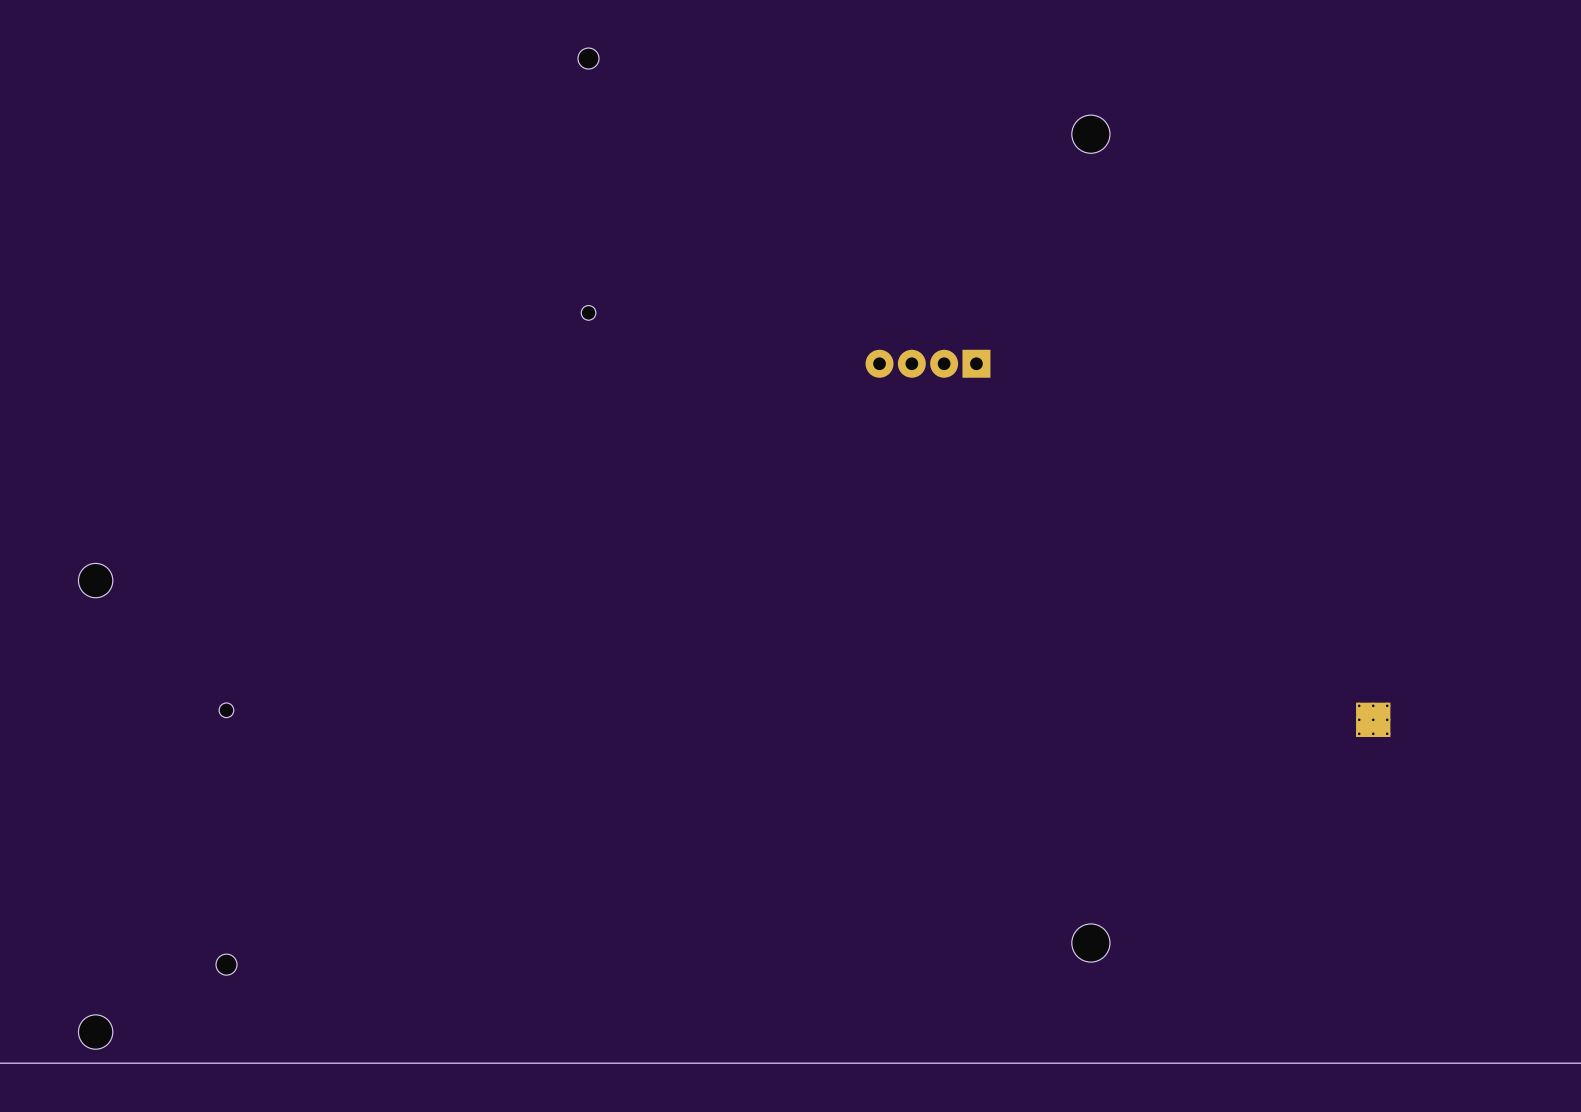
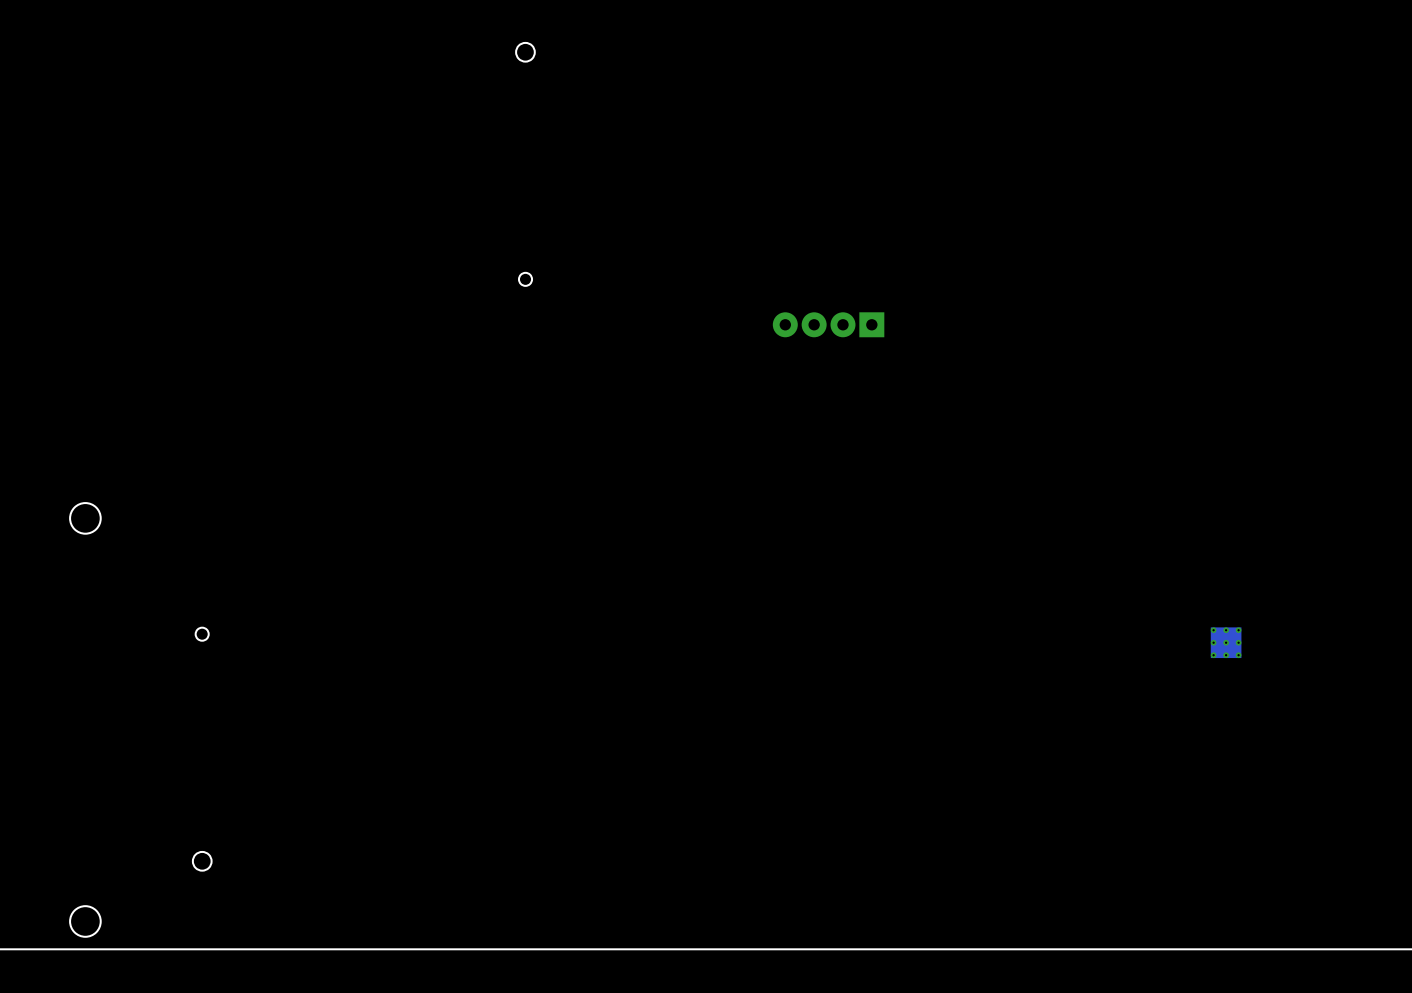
part: (1090, 134) -> none
part: (1090, 943) -> none

